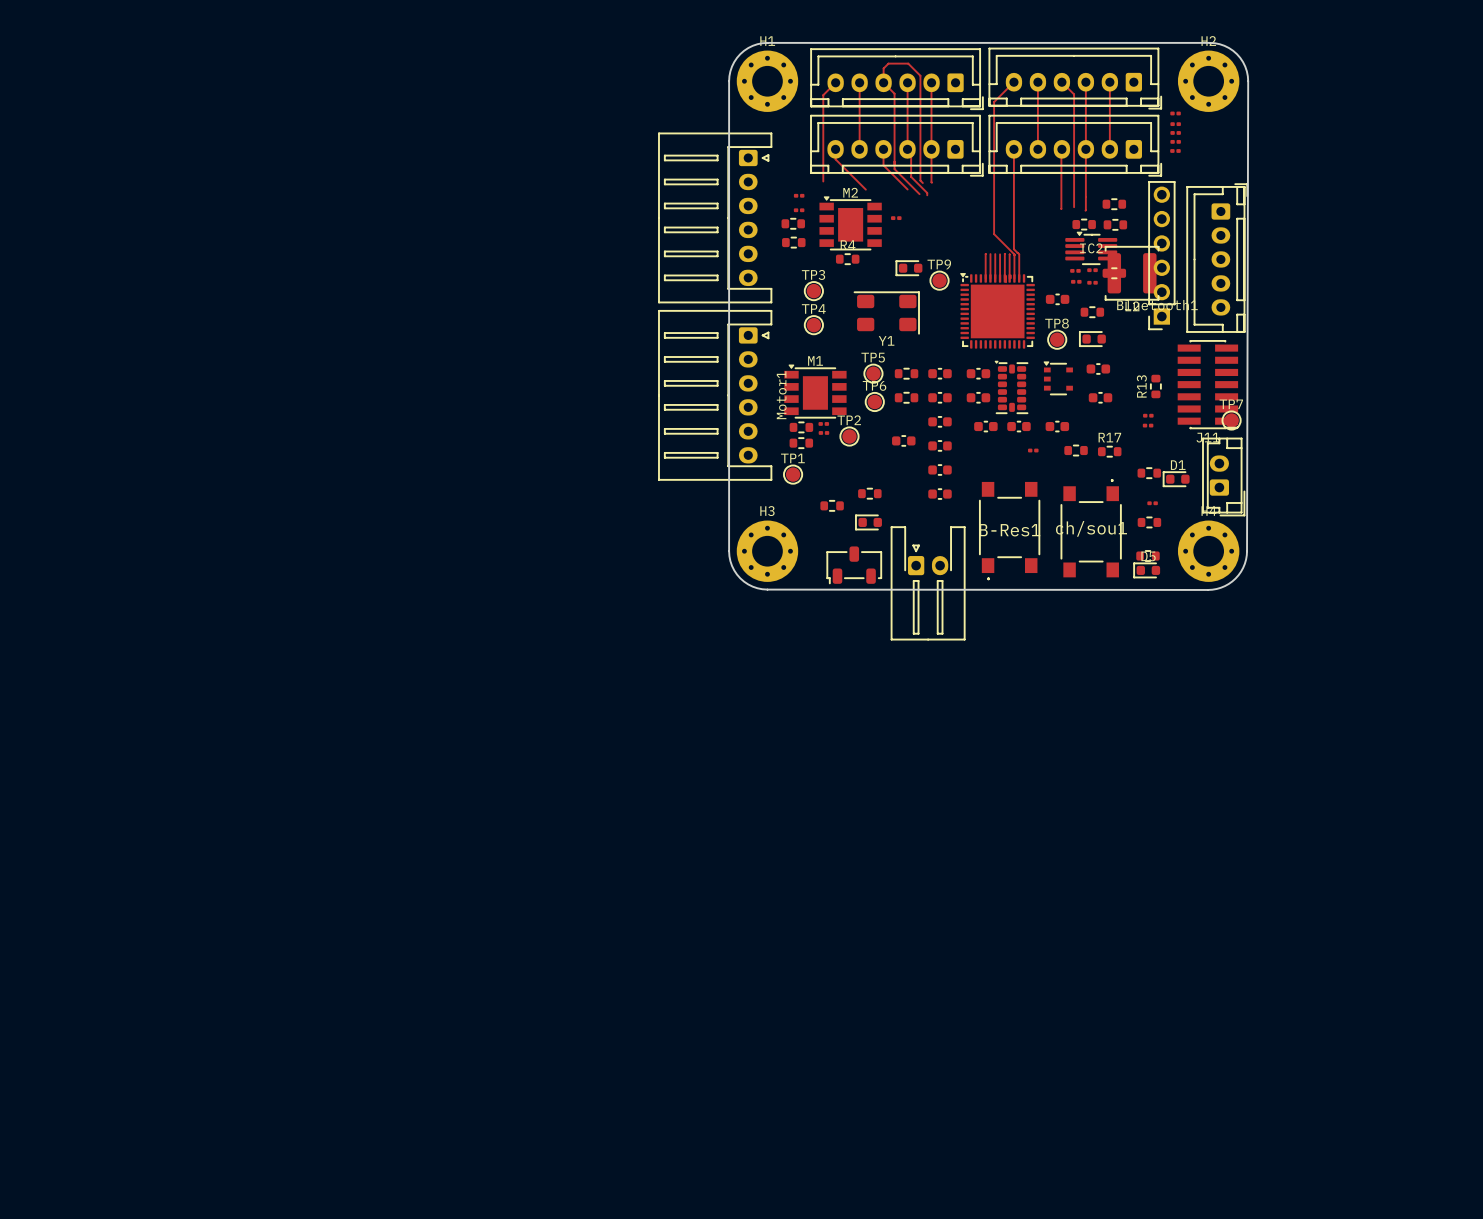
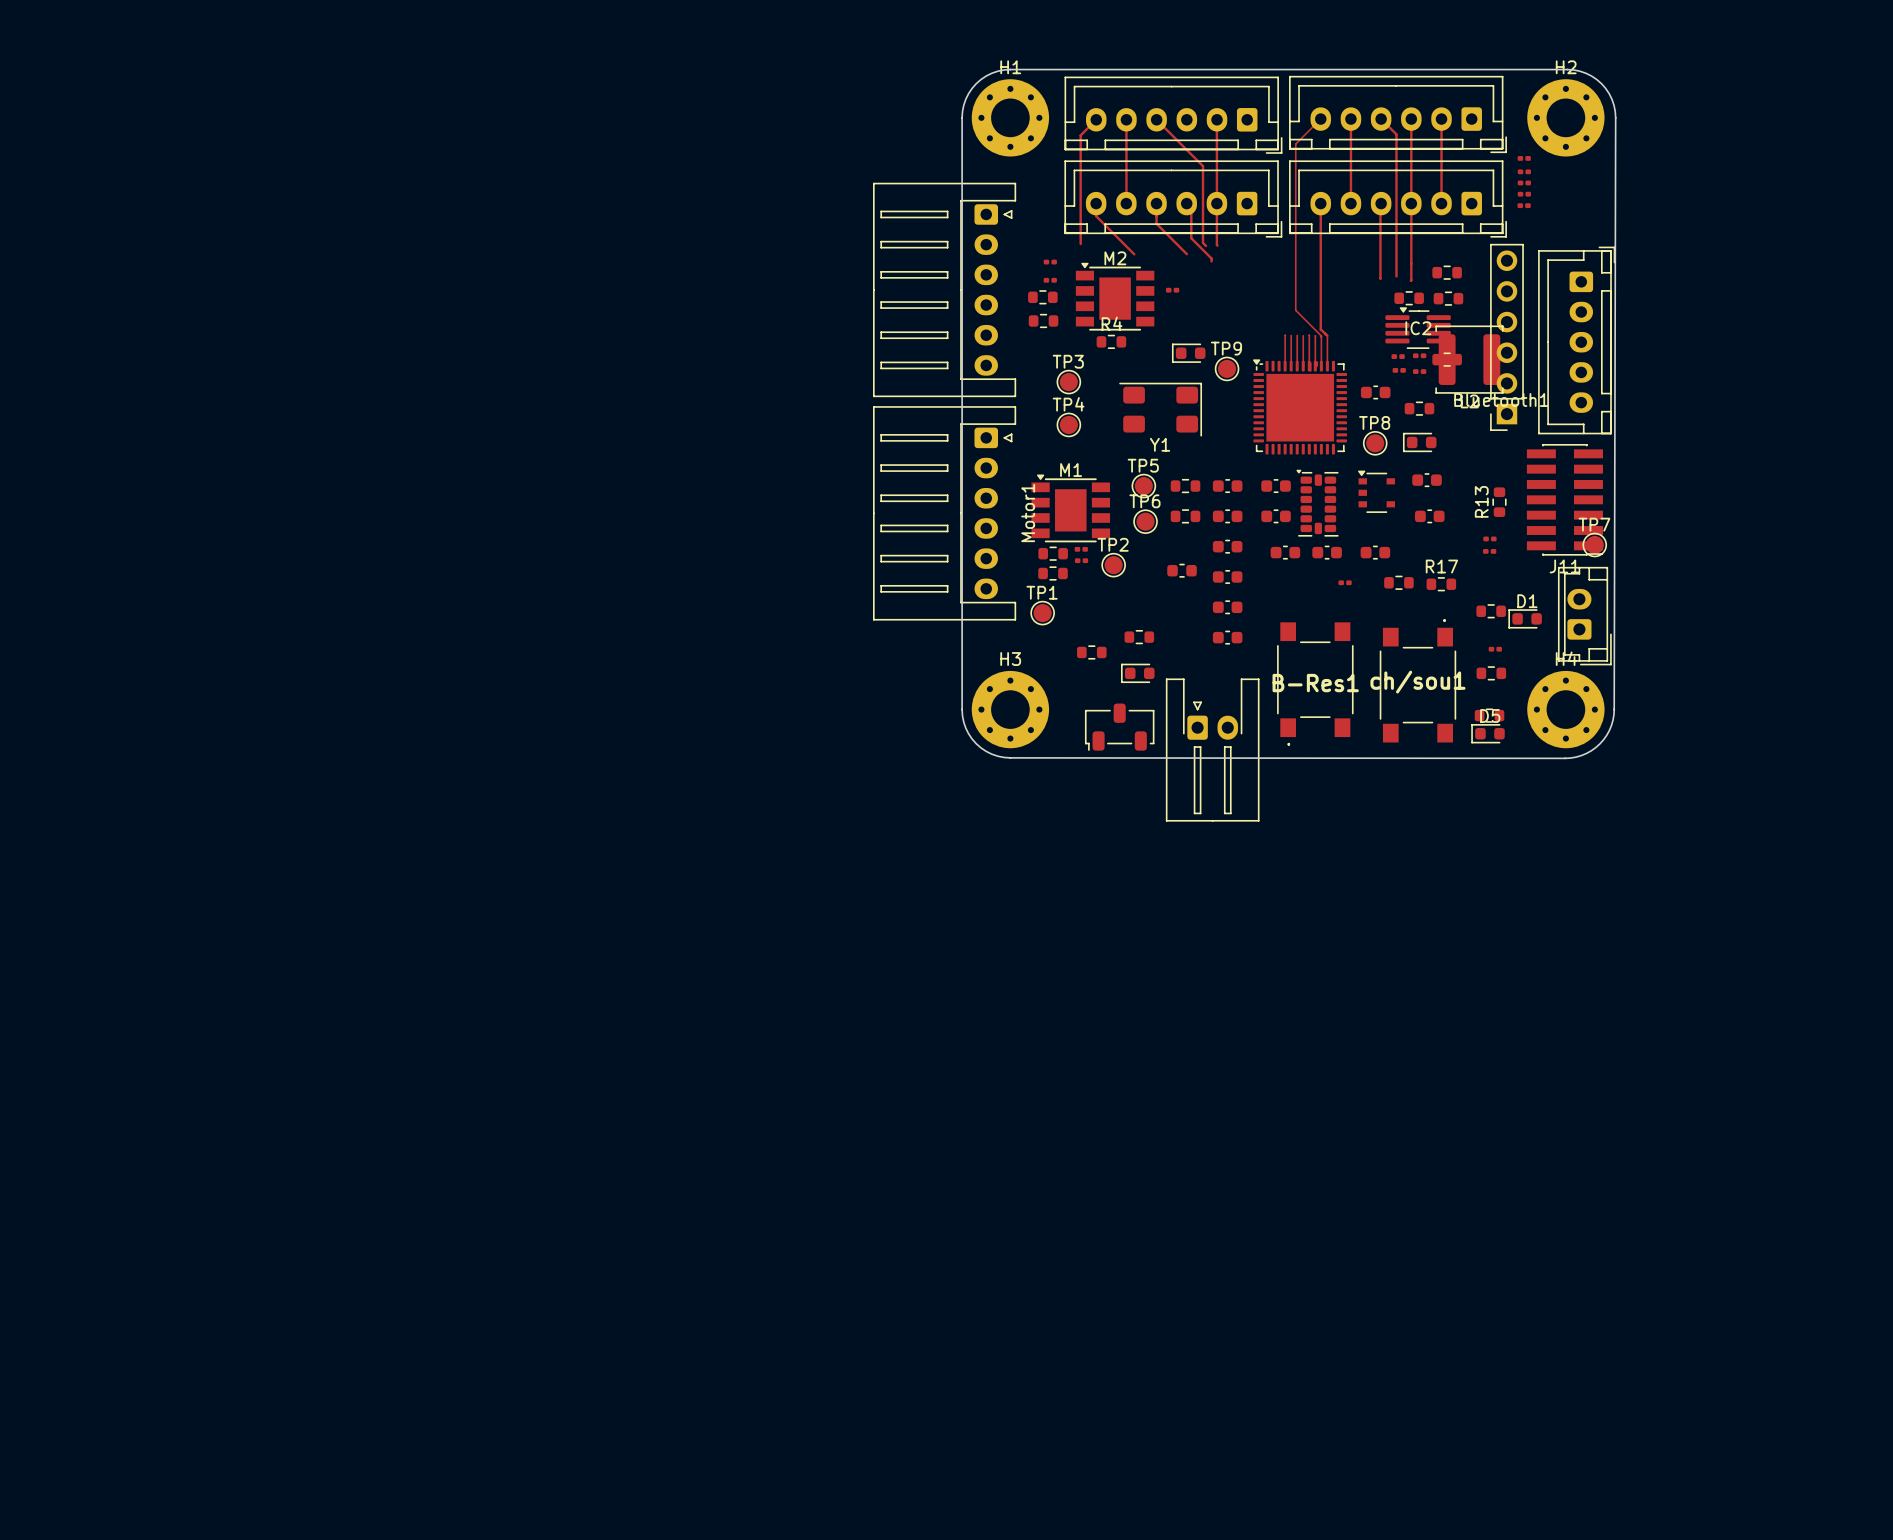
track: (883, 82) (883, 68) (888, 63) (908, 63) (920, 75) (920, 119) -> (1170, 133) (1203, 166)
track: (907, 82) (907, 149) -> none
track: (894, 93) (894, 169) (919, 194) -> none

